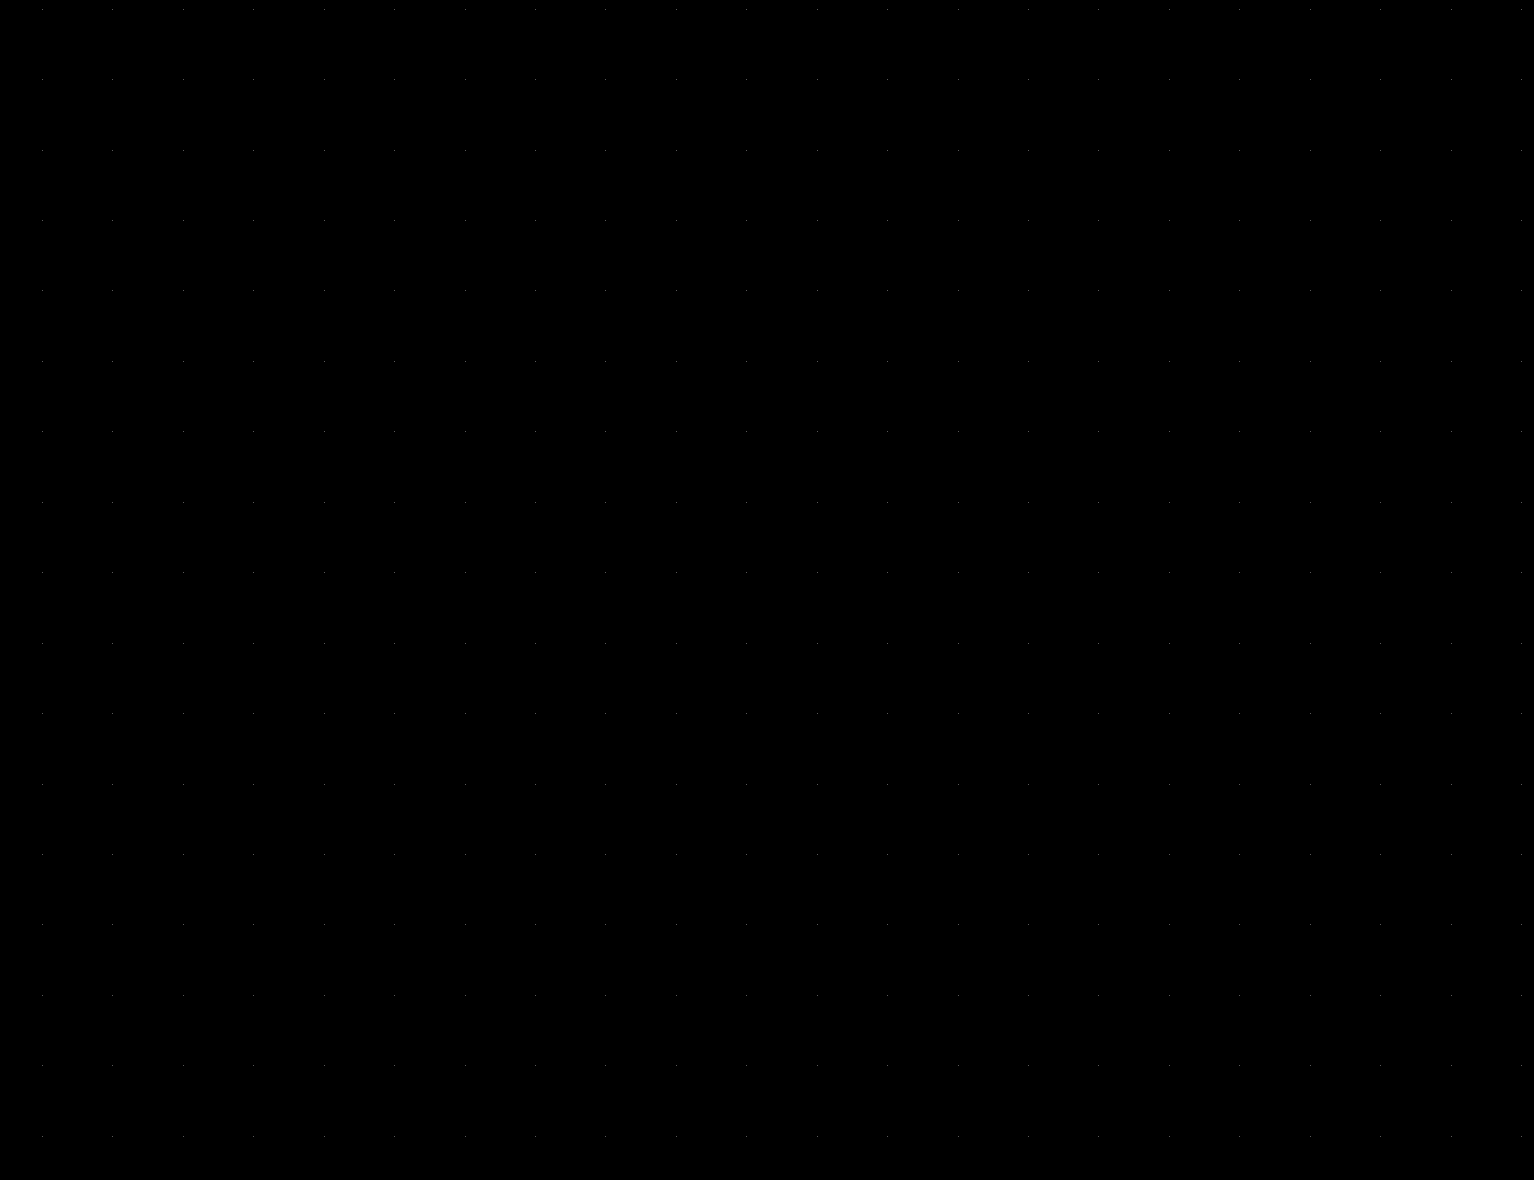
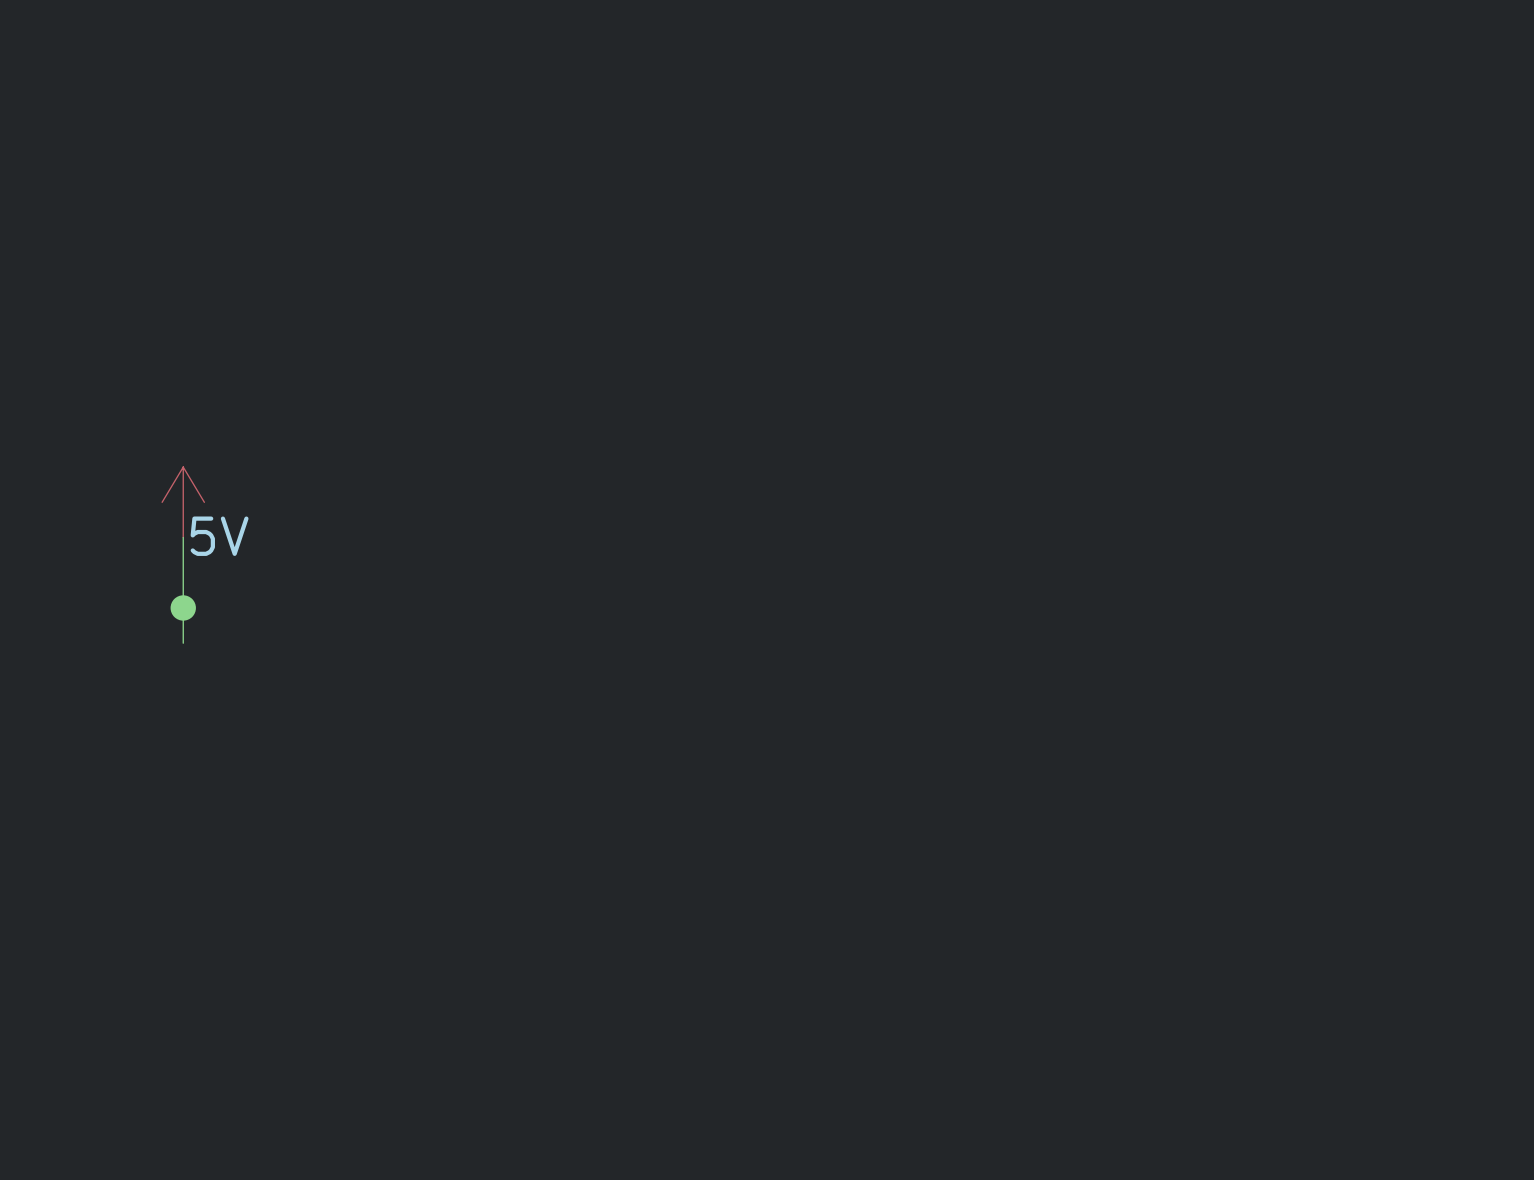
power symbol: none -> 5V (183, 502)
wire: none -> (183, 537) (183, 643)
junction: none -> (183, 607)

